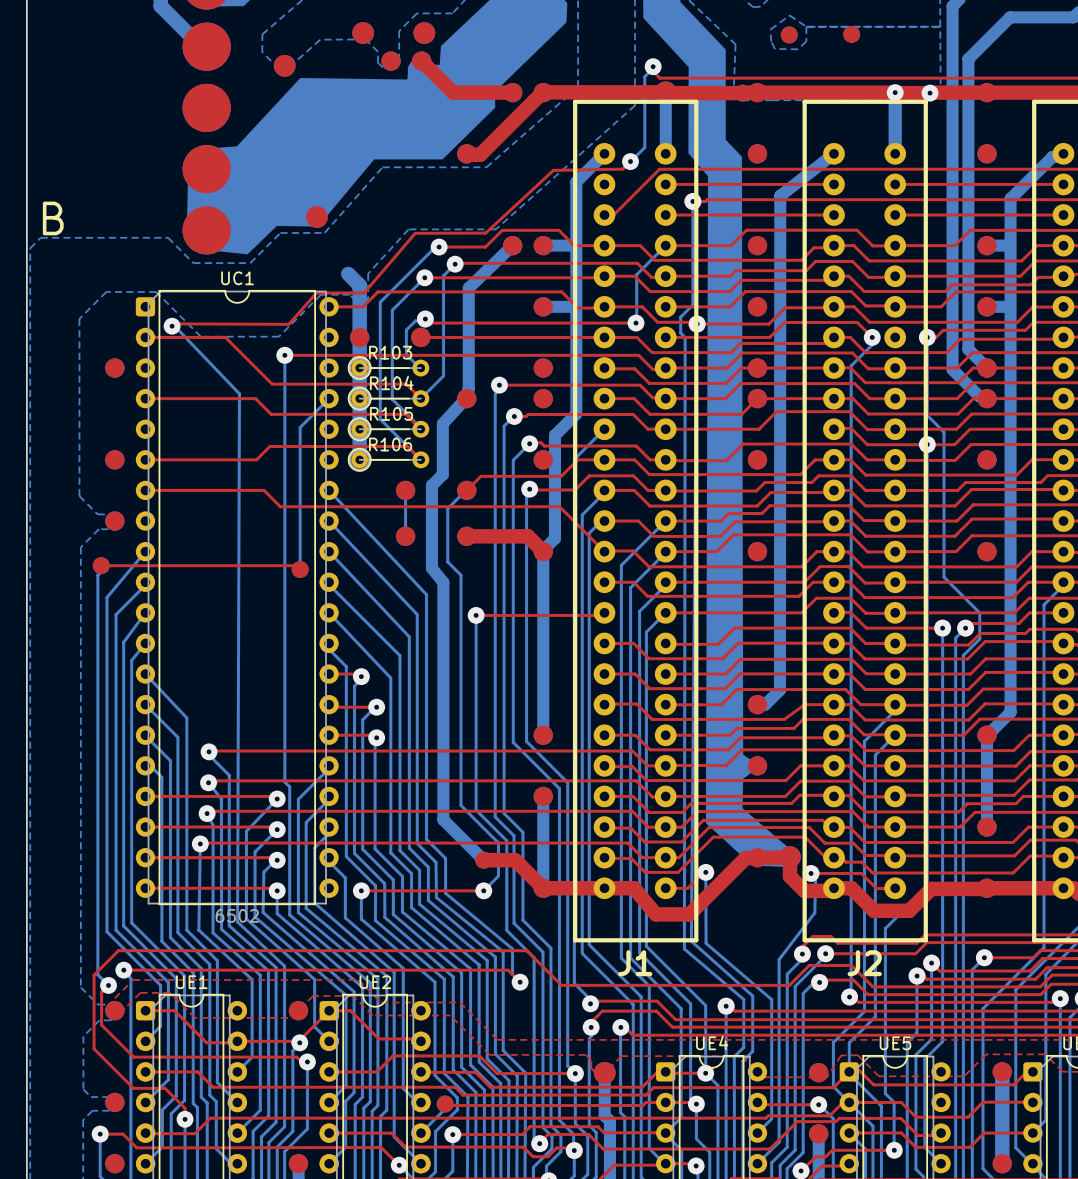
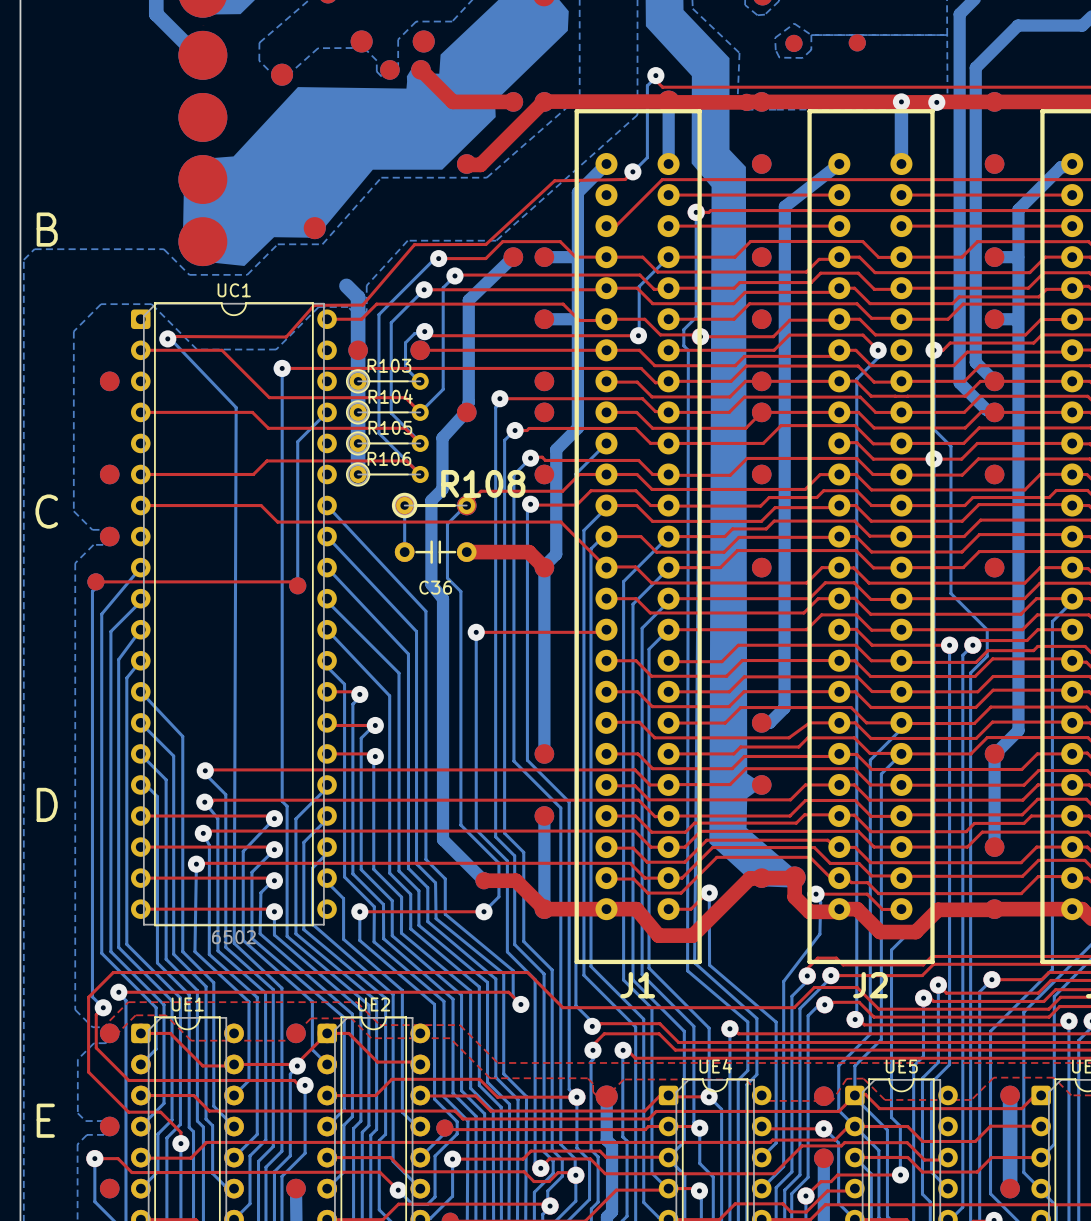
R108: none -> (433, 505)
text: none -> C (46, 511)
C36: none -> (435, 552)
text: none -> D (47, 804)
text: none -> E (45, 1120)

